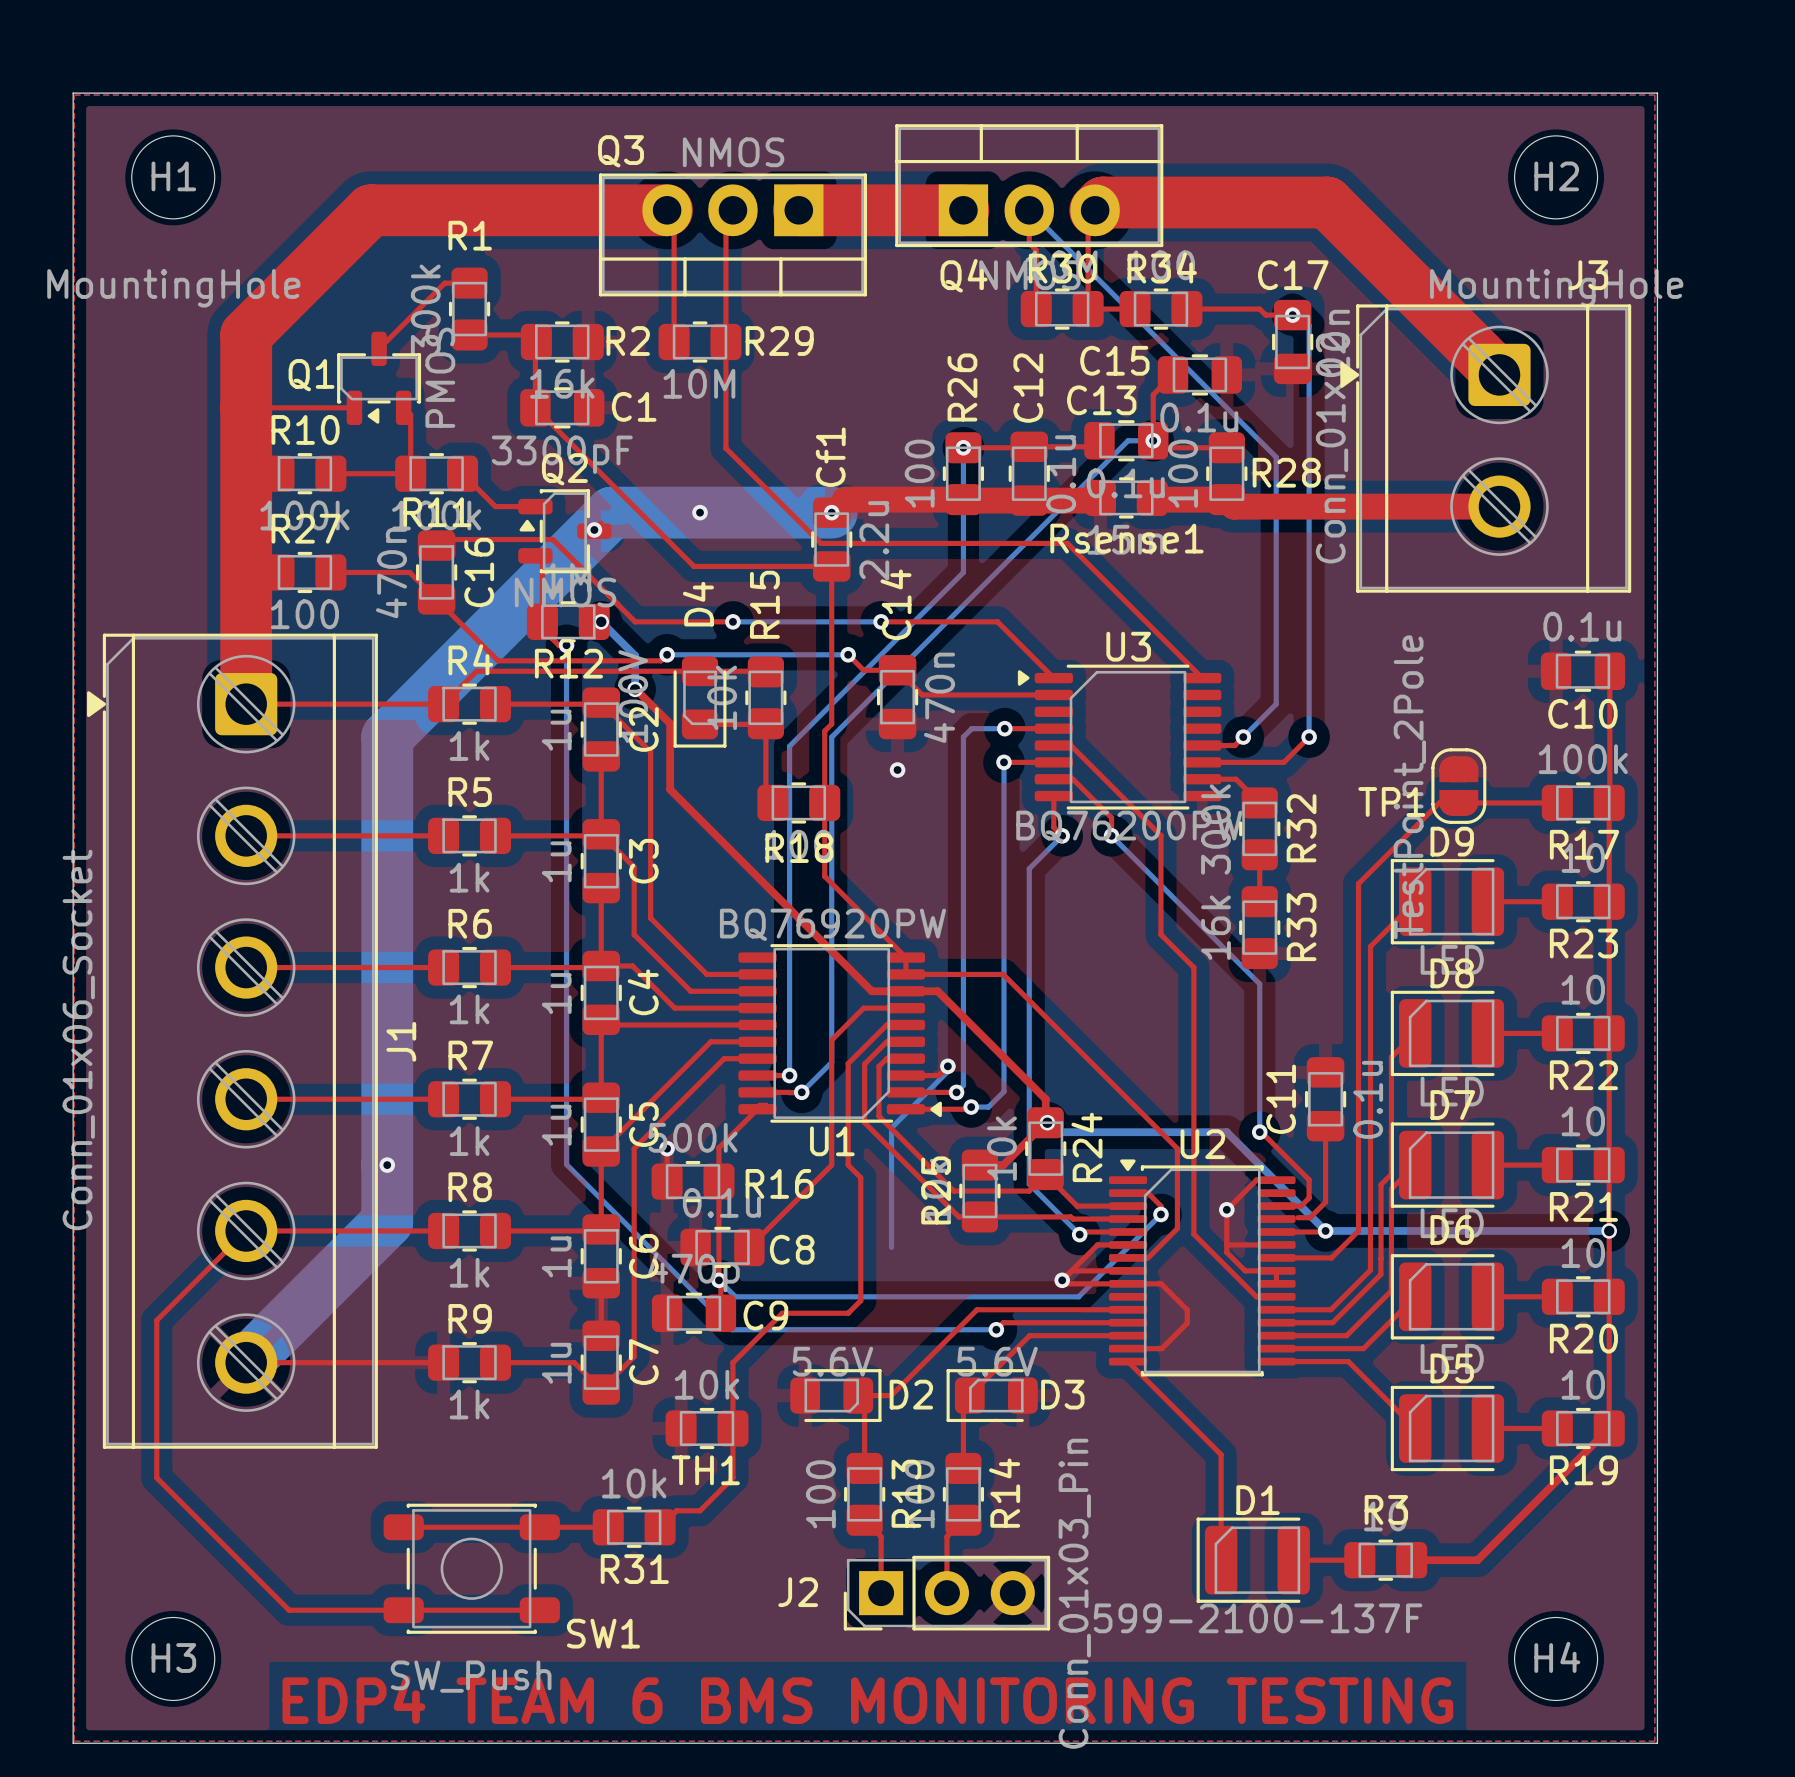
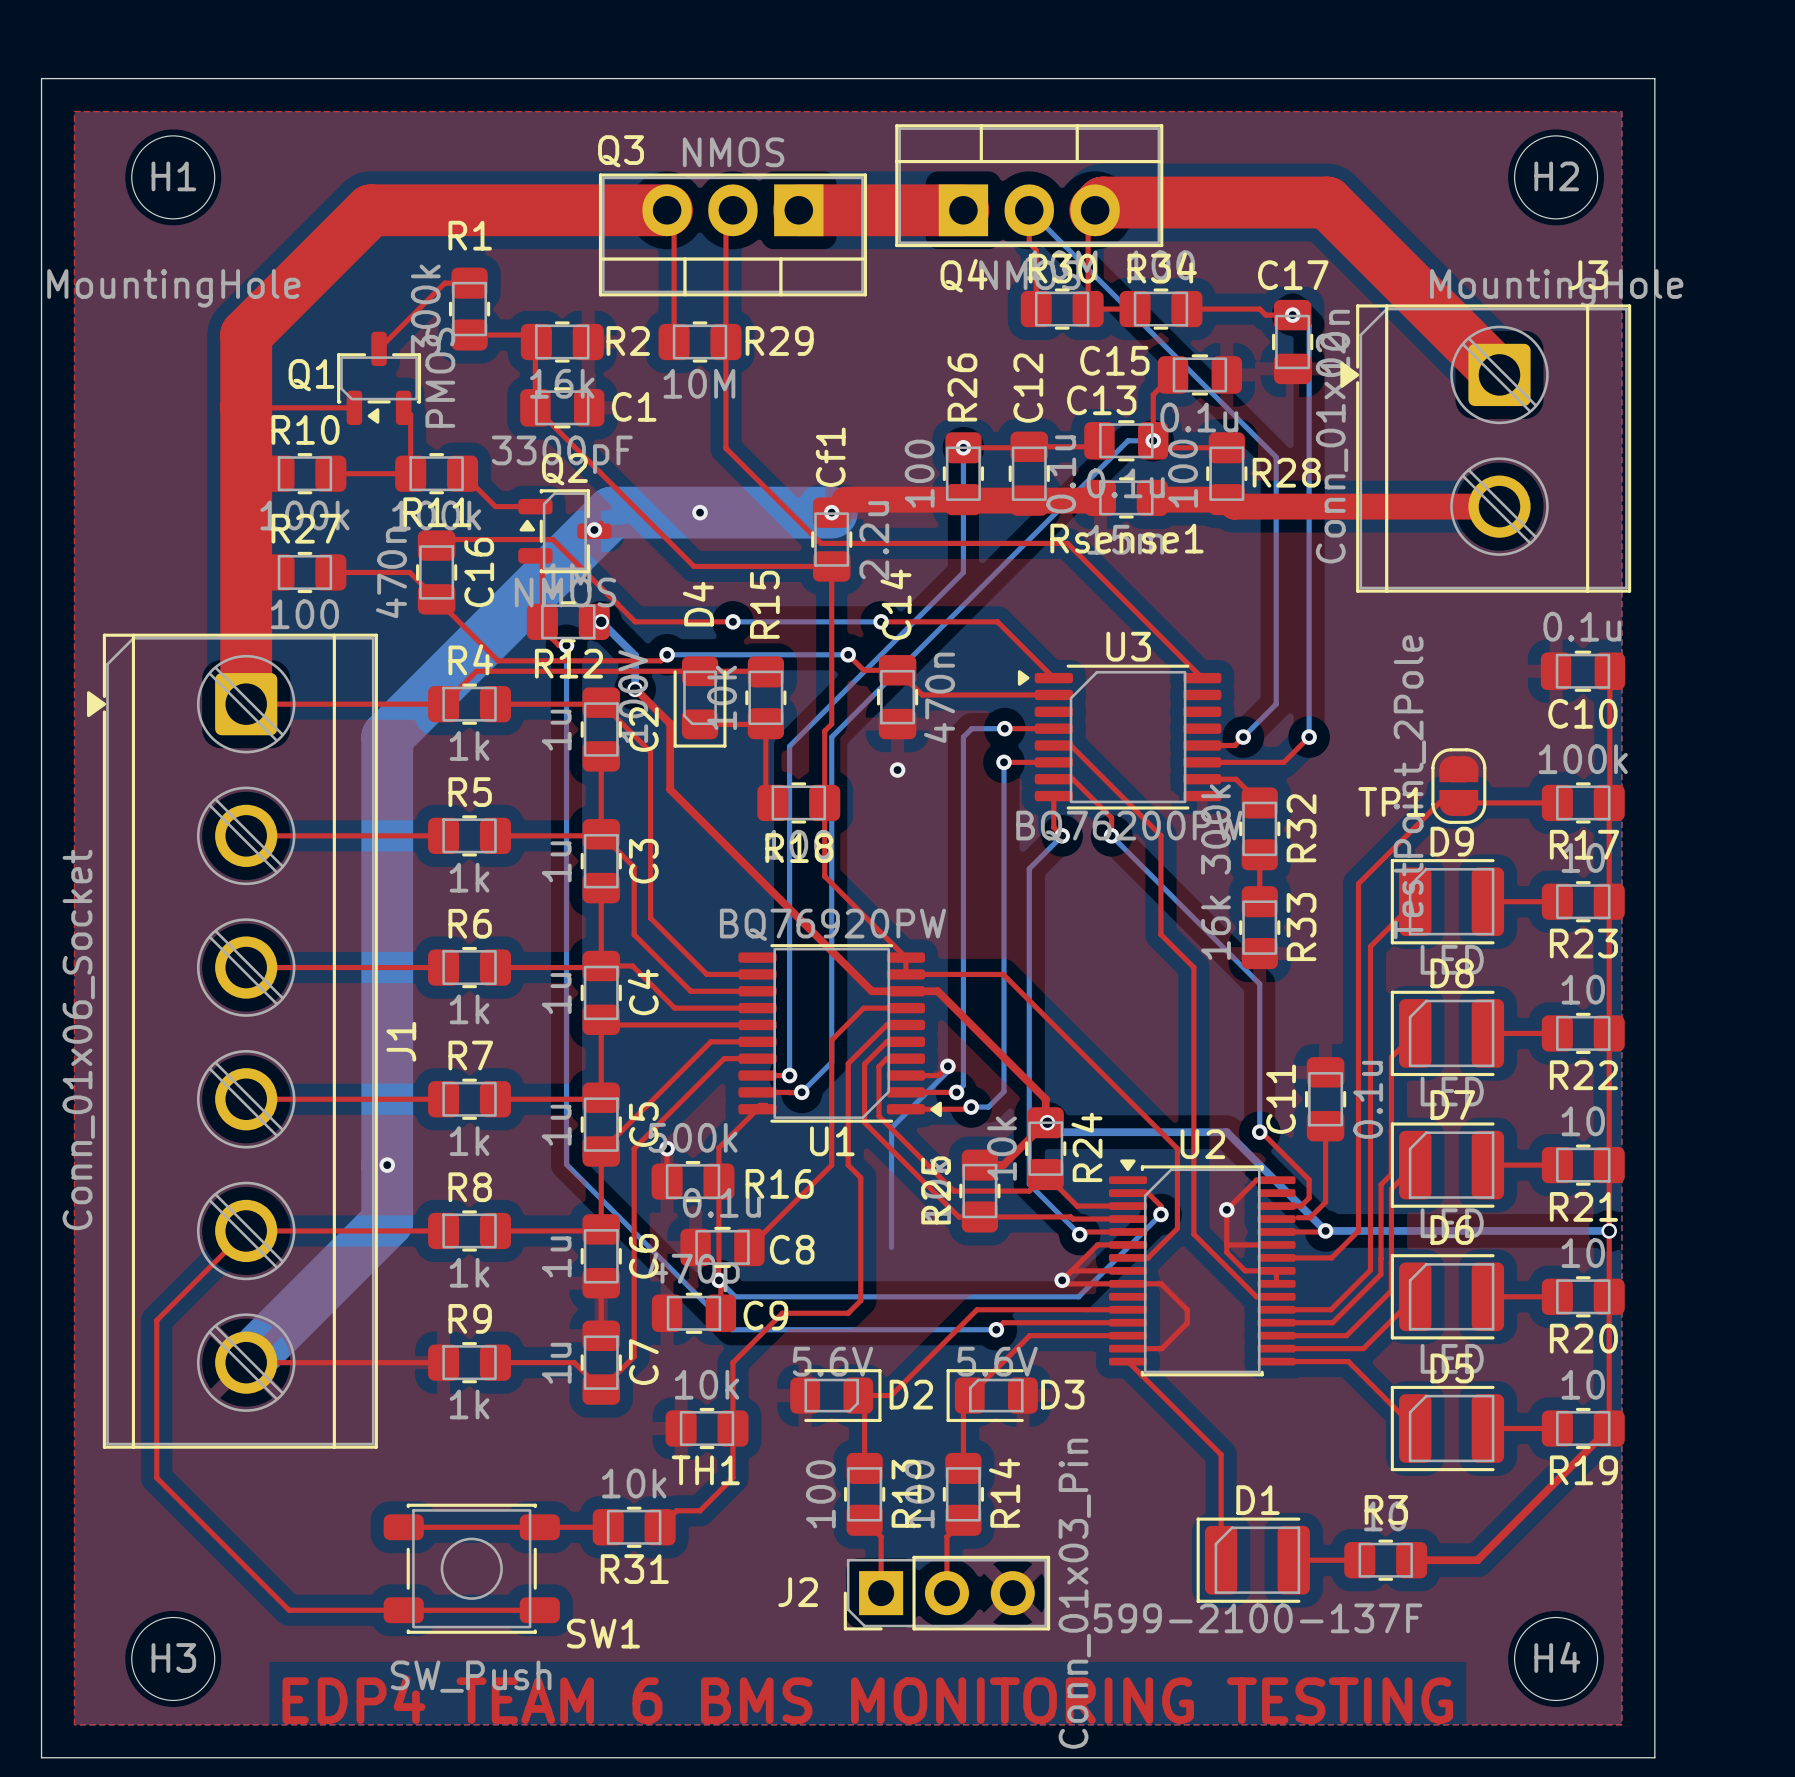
board edge: (73, 93) (1657, 93) (1657, 1743) (73, 1743) (73, 93) -> (41, 78) (41, 1757) (1654, 1757) (1654, 78) (41, 78)
top zone outline: (74, 111) (74, 95) (1654, 95) (1654, 1741) (74, 1741) (74, 1724) -> (74, 111) (1621, 111) (1621, 1724) (74, 1724)

